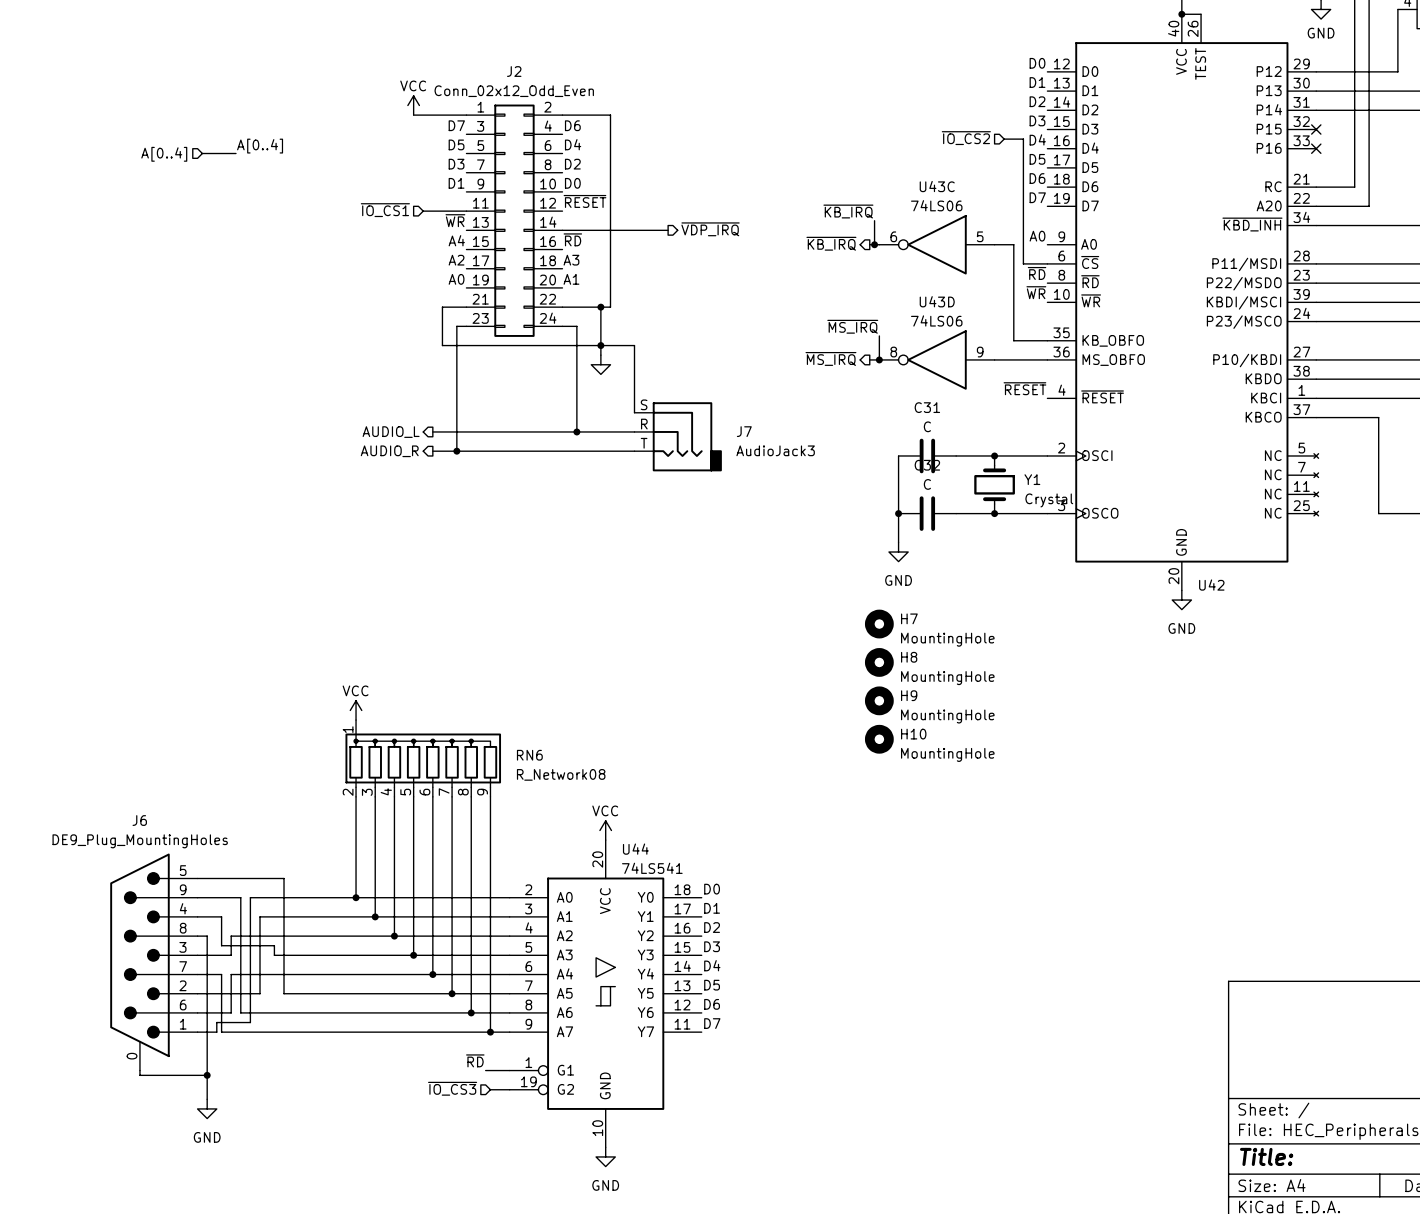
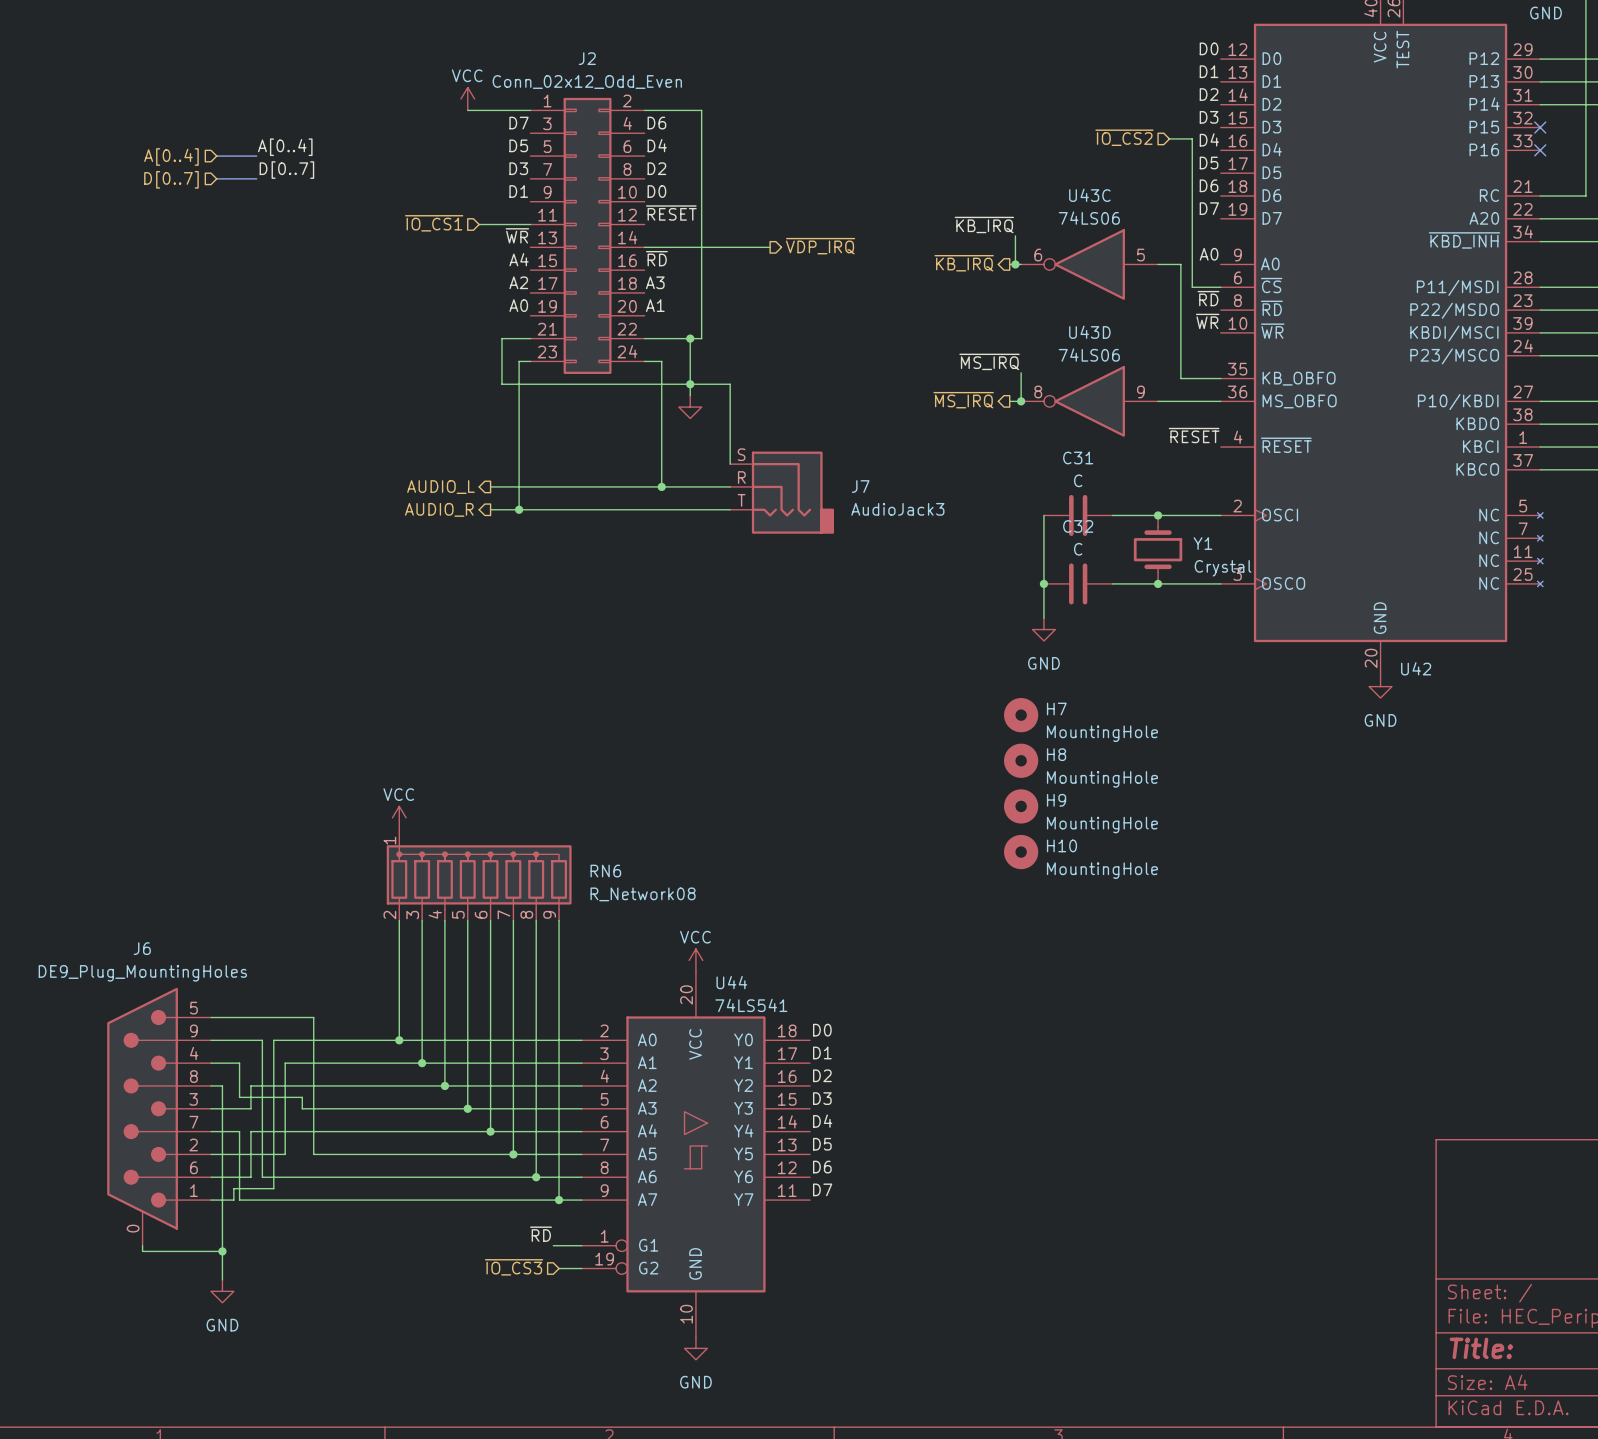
label: none -> D[0..7] (286, 170)
bus: none -> (216, 178) (256, 178)
hierarchical label: none -> D[0..7] (171, 179)

